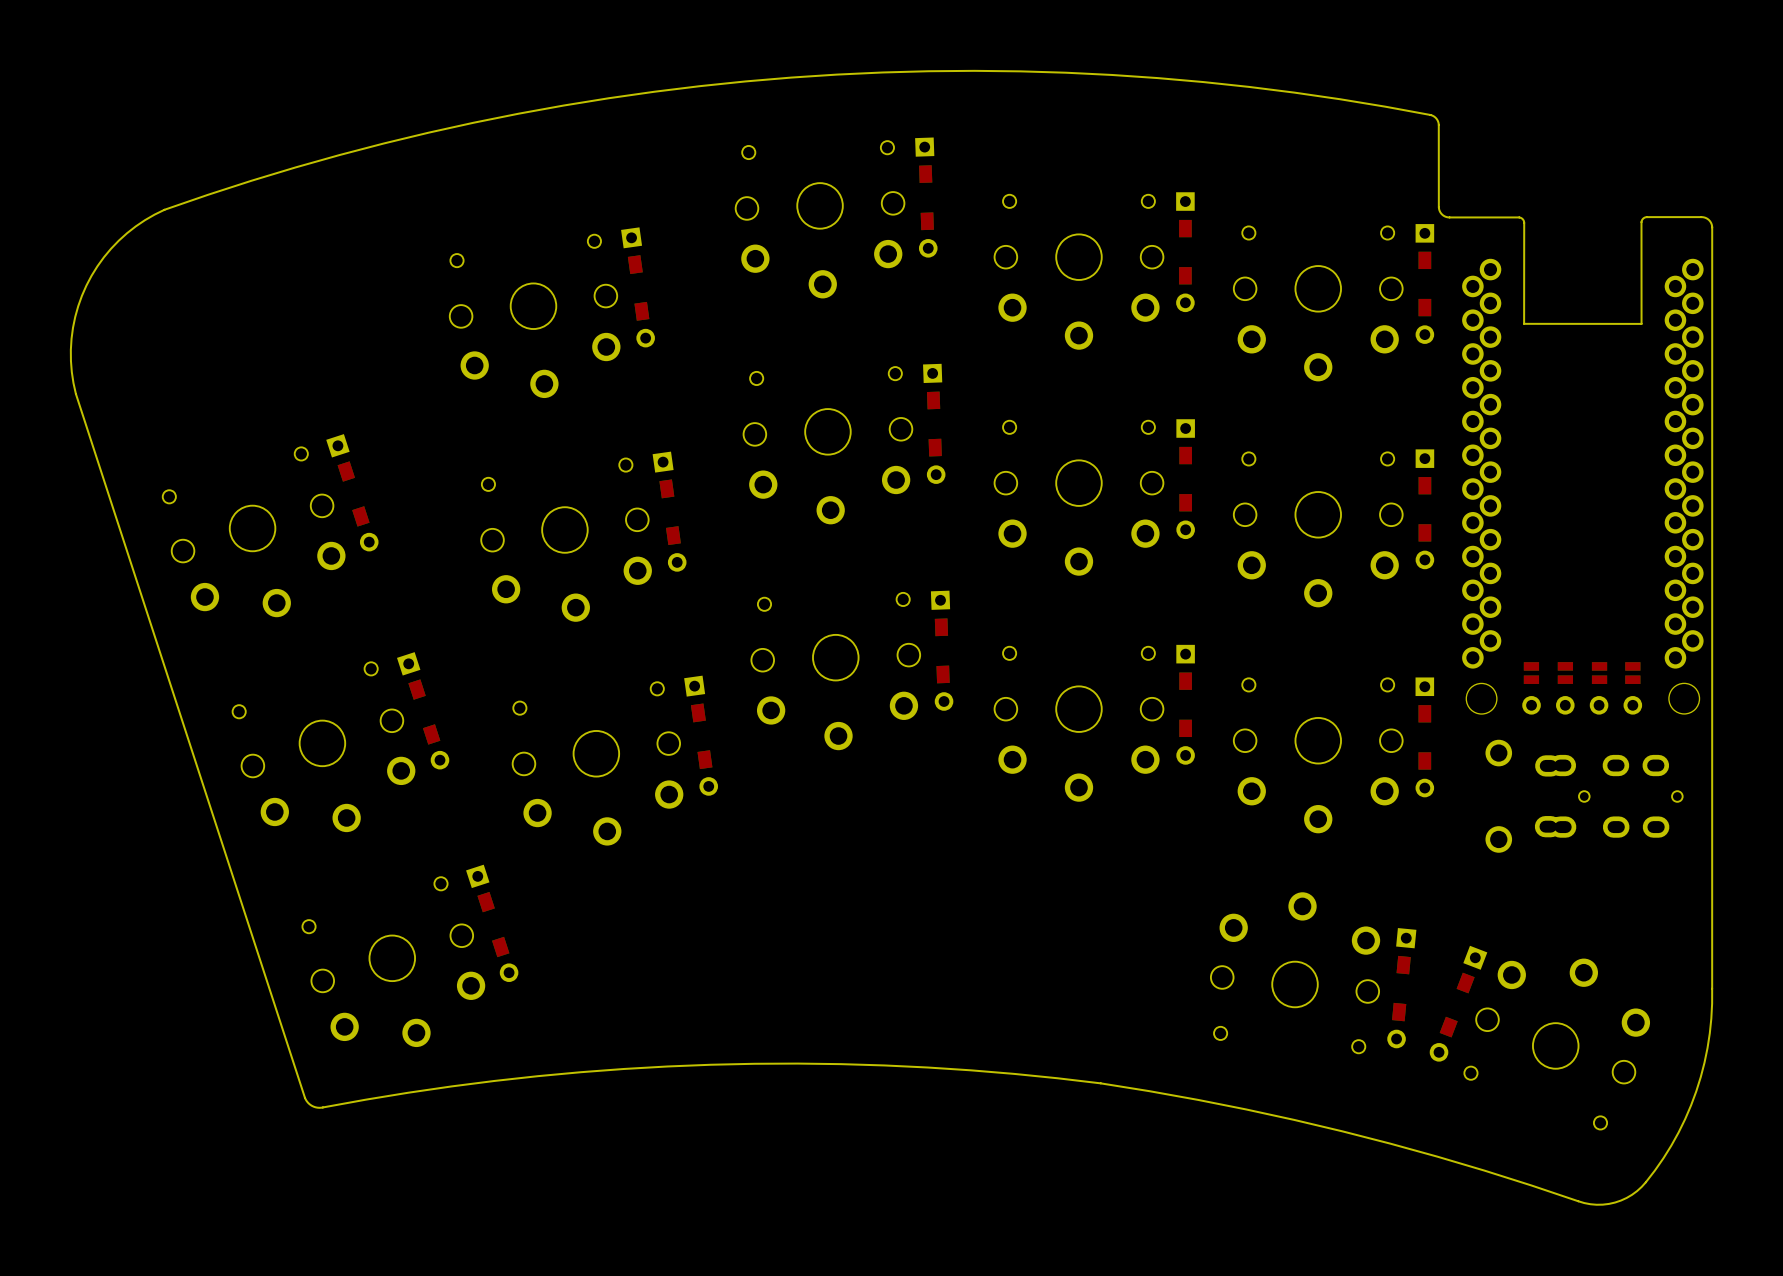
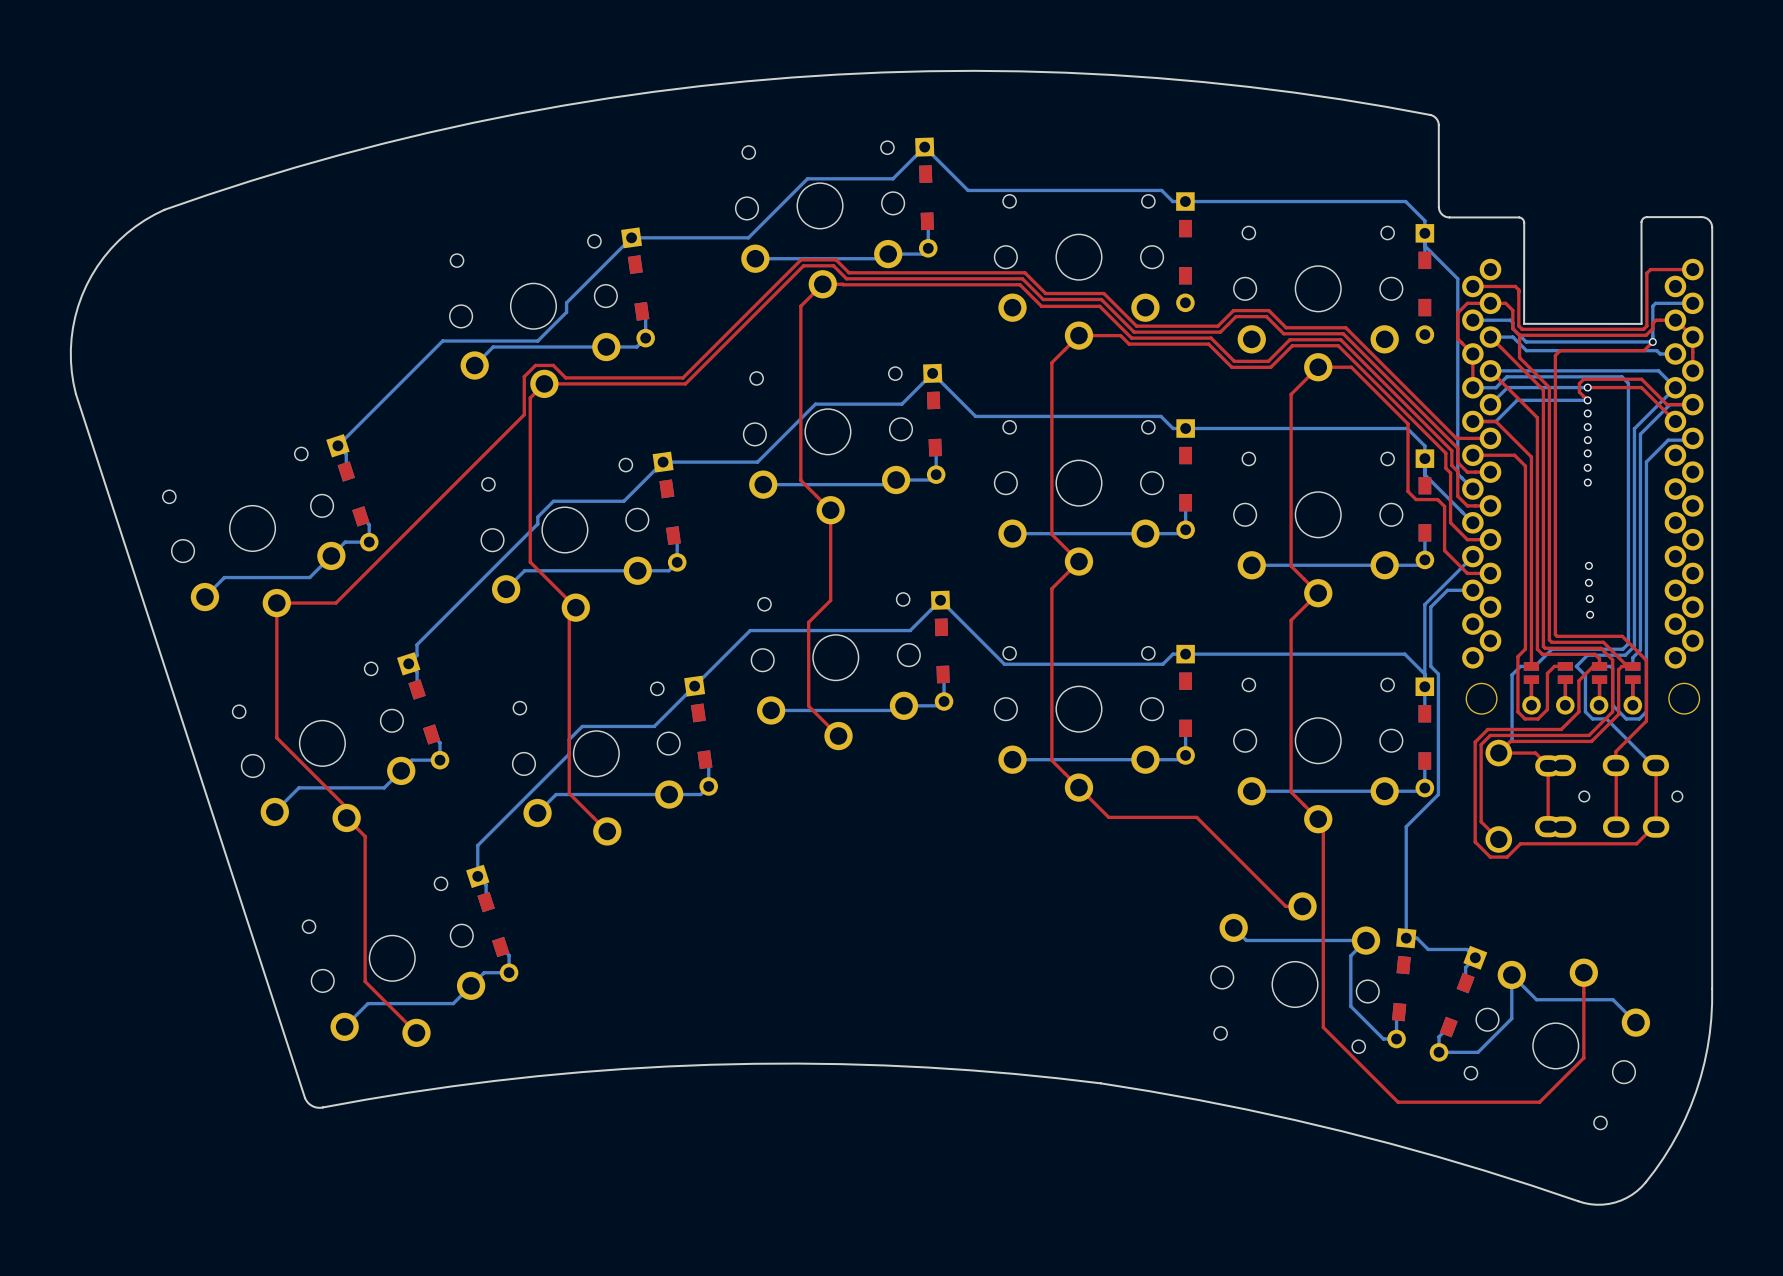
bottom track: none -> (927, 221) (928, 248) (922, 254) (888, 254) (883, 258) (755, 258)
bottom track: none -> (1424, 245) (1457, 278) (1457, 473) (1472, 489)
bottom track: none -> (1424, 260) (1424, 220) (1405, 201) (1172, 201) (1161, 190) (968, 190) (924, 147) (893, 178) (807, 178) (748, 237) (631, 237) (566, 302) (566, 312) (537, 341) (442, 341) (337, 445) (346, 454) (346, 471)
top track: none -> (1692, 269) (1650, 269) (1646, 273) (1646, 326) (1643, 329)
top track: none -> (1472, 286) (1515, 286) (1518, 291)
top track: none -> (1518, 291) (1518, 326) (1522, 329) (1643, 329)
bottom track: none -> (1692, 303) (1655, 303) (1652, 306) (1652, 341) (1526, 341) (1512, 328) (1512, 322) (1510, 320) (1472, 320)
bottom track: none -> (641, 311) (645, 315) (645, 338) (636, 347) (493, 347) (474, 365)
top track: none -> (1519, 335) (1646, 335) (1652, 328) (1652, 323) (1656, 320) (1675, 320) (1692, 337) (1692, 370)
top track: none -> (1519, 335) (1512, 328) (1512, 310) (1505, 303) (1467, 303) (1457, 312) (1457, 338) (1472, 353) (1472, 387)
top track: none -> (1519, 335) (1519, 357) (1549, 387) (1549, 639) (1551, 642) (1603, 642) (1627, 666)
bottom track: none -> (1490, 337) (1512, 337) (1526, 350) (1656, 350) (1660, 353) (1675, 353)
top track: none -> (1490, 337) (1543, 389) (1543, 646) (1545, 648) (1600, 648) (1612, 659) (1612, 711) (1589, 735) (1490, 735) (1481, 744) (1481, 821) (1498, 839)
top track: none -> (1652, 341) (1644, 350) (1560, 350) (1555, 355) (1555, 634) (1557, 636) (1622, 636) (1646, 660) (1646, 721) (1615, 751) (1616, 827)
via: none -> (1652, 341)
bottom track: none -> (1490, 370) (1658, 370) (1675, 387) (1634, 428)
top track: none -> (1490, 370) (1537, 417) (1537, 649) (1542, 654) (1594, 654) (1599, 658) (1599, 666) (1593, 666) (1578, 680) (1578, 711) (1561, 729) (1487, 729) (1475, 742) (1475, 841) (1490, 857) (1507, 857) (1520, 843) (1636, 843) (1653, 827) (1656, 827) (1655, 765)
bottom track: none -> (1472, 387) (1495, 387) (1506, 376) (1621, 376) (1628, 383) (1628, 643) (1622, 649) (1552, 649) (1534, 666) (1520, 666) (1512, 674) (1512, 739) (1498, 753)
bottom track: none -> (1587, 387) (1507, 387) (1490, 404)
top track: none -> (1587, 387) (1641, 387) (1675, 421)
via: none -> (1587, 387)
bottom track: none -> (1587, 400) (1517, 400) (1495, 421) (1472, 421)
top track: none -> (1587, 400) (1579, 392) (1579, 383) (1583, 379) (1641, 379) (1667, 404) (1692, 404)
via: none -> (1587, 400)
bottom track: none -> (1692, 404) (1670, 404) (1640, 434) (1640, 650) (1632, 657) (1632, 666)
via: none -> (1587, 413)
top track: none -> (1472, 421) (1495, 421) (1531, 456) (1531, 666)
via: none -> (1587, 427)
bottom track: none -> (1634, 428) (1634, 646) (1625, 655) (1587, 655) (1576, 666) (1585, 675) (1585, 711) (1592, 718) (1606, 718) (1653, 765) (1655, 765)
top track: none -> (1490, 438) (1456, 438) (1345, 327) (1286, 327) (1268, 310) (1233, 310) (1217, 326) (1136, 326) (1103, 293) (1045, 293) (1024, 272) (849, 272) (836, 259) (801, 259) (683, 377) (565, 377) (553, 365) (535, 365) (524, 376) (524, 414) (335, 603) (276, 603)
bottom track: none -> (1692, 438) (1691, 440) (1668, 440) (1646, 461) (1646, 711) (1639, 718) (1626, 718) (1612, 705) (1612, 668) (1610, 666) (1599, 666)
via: none -> (1587, 440)
bottom track: none -> (935, 447) (936, 474) (930, 479) (896, 479) (891, 484) (763, 484)
via: none -> (1587, 453)
top track: none -> (1472, 455) (1514, 455) (1525, 466) (1525, 649) (1517, 656) (1517, 711) (1525, 718) (1538, 718) (1547, 709) (1547, 673) (1554, 666) (1565, 666)
via: none -> (1587, 467)
top track: none -> (1490, 472) (1467, 472) (1457, 462) (1457, 448) (1343, 333) (1283, 333) (1266, 316) (1235, 316) (1220, 332) (1134, 332) (1101, 299) (1043, 299) (1022, 278) (846, 278) (833, 265) (803, 265) (685, 383) (544, 383) (530, 398) (530, 562) (575, 607) (569, 614) (569, 793) (607, 831)
bottom track: none -> (1424, 474) (1472, 522)
via: none -> (1587, 482)
bottom track: none -> (1424, 485) (1424, 446) (1407, 428) (1173, 428) (1160, 416) (975, 416) (932, 373) (901, 404) (815, 404) (757, 462) (663, 462) (623, 501) (553, 501) (537, 516) (537, 523) (417, 644) (417, 655) (408, 663) (417, 672) (417, 689)
bottom track: none -> (1185, 502) (1185, 529) (1181, 533) (1012, 533)
top track: none -> (1490, 505) (1467, 505) (1457, 496) (1457, 471) (1451, 465) (1451, 450) (1340, 339) (1289, 339) (1268, 361) (1234, 361) (1211, 338) (1131, 338) (1099, 306) (1041, 306) (1020, 284) (822, 284) (800, 306) (800, 480) (830, 510) (830, 600) (808, 622) (808, 706) (838, 736)
bottom track: none -> (360, 516) (369, 524) (369, 542) (345, 542) (309, 577) (224, 577) (204, 597)
bottom track: none -> (1424, 532) (1424, 559) (1419, 565) (1251, 565)
bottom track: none -> (673, 535) (677, 539) (677, 562) (668, 570) (524, 570) (506, 589)
top track: none -> (1490, 539) (1467, 539) (1450, 522) (1450, 473) (1445, 468) (1445, 453) (1338, 345) (1292, 345) (1270, 367) (1231, 367) (1208, 344) (1129, 344) (1120, 335) (1078, 335) (1051, 362) (1051, 534) (1078, 561) (1051, 588) (1051, 760) (1108, 817) (1196, 817) (1285, 906) (1302, 906)
bottom track: none -> (1472, 556) (1424, 604) (1424, 713)
via: none -> (1588, 565)
top track: none -> (1490, 573) (1467, 573) (1444, 550) (1444, 506) (1437, 499) (1416, 499) (1408, 491) (1408, 423) (1351, 367) (1318, 367) (1291, 394) (1291, 566) (1318, 593) (1291, 620) (1291, 792) (1323, 824) (1323, 1027) (1398, 1102) (1539, 1102) (1583, 1057) (1583, 972)
via: none -> (1588, 582)
bottom track: none -> (1472, 590) (1447, 590) (1430, 607) (1430, 666) (1438, 674) (1438, 794) (1406, 826) (1406, 938) (1416, 938) (1428, 949) (1467, 949) (1475, 957) (1465, 967) (1465, 983)
via: none -> (1589, 599)
top track: none -> (276, 603) (276, 737) (346, 807) (346, 817) (365, 836) (365, 981) (416, 1032)
via: none -> (1590, 614)
top track: none -> (1632, 666) (1621, 666) (1618, 669) (1618, 714) (1591, 741) (1510, 741) (1498, 753) (1535, 753) (1548, 765)
bottom track: none -> (943, 674) (944, 701) (939, 705) (903, 705) (899, 710) (771, 710)
bottom track: none -> (1424, 674) (1404, 654) (1173, 654) (1162, 664) (1004, 664) (940, 600) (910, 630) (750, 630) (654, 726) (582, 726) (569, 739) (569, 754) (477, 845) (477, 876) (486, 884) (486, 902)
top track: none -> (1531, 679) (1531, 705)
top track: none -> (1565, 679) (1565, 705)
top track: none -> (1599, 679) (1599, 705)
top track: none -> (1632, 679) (1632, 705)
bottom track: none -> (1185, 728) (1185, 755) (1181, 759) (1012, 759)
bottom track: none -> (431, 734) (440, 742) (440, 760) (411, 760) (384, 787) (298, 787) (274, 811)
bottom track: none -> (704, 759) (708, 763) (708, 786) (700, 794) (556, 794) (537, 813)
bottom track: none -> (1424, 760) (1424, 788) (1421, 791) (1251, 791)
top track: none -> (1548, 765) (1548, 826) (1563, 827)
bottom track: none -> (1233, 927) (1246, 940) (1365, 940)
bottom track: none -> (1366, 940) (1350, 955) (1350, 1006) (1383, 1039) (1396, 1039) (1396, 1014) (1399, 1012)
bottom track: none -> (500, 946) (509, 955) (509, 972) (484, 972) (453, 1003) (367, 1003) (344, 1026)
bottom track: none -> (1635, 1022) (1613, 999) (1536, 999) (1511, 974) (1511, 1018) (1478, 1052) (1439, 1052) (1439, 1036) (1448, 1027)

